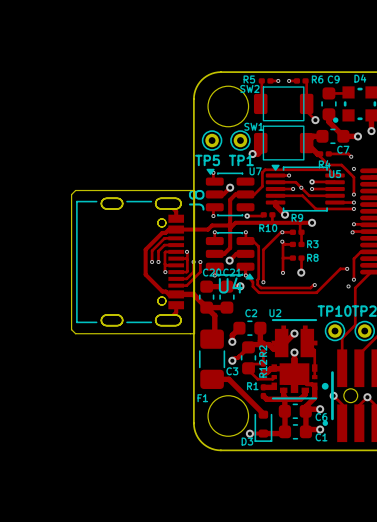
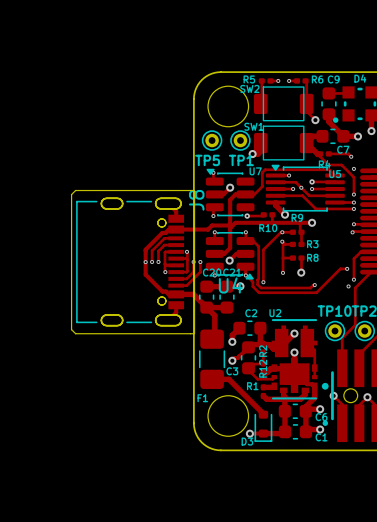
via: none -> (145, 262)

